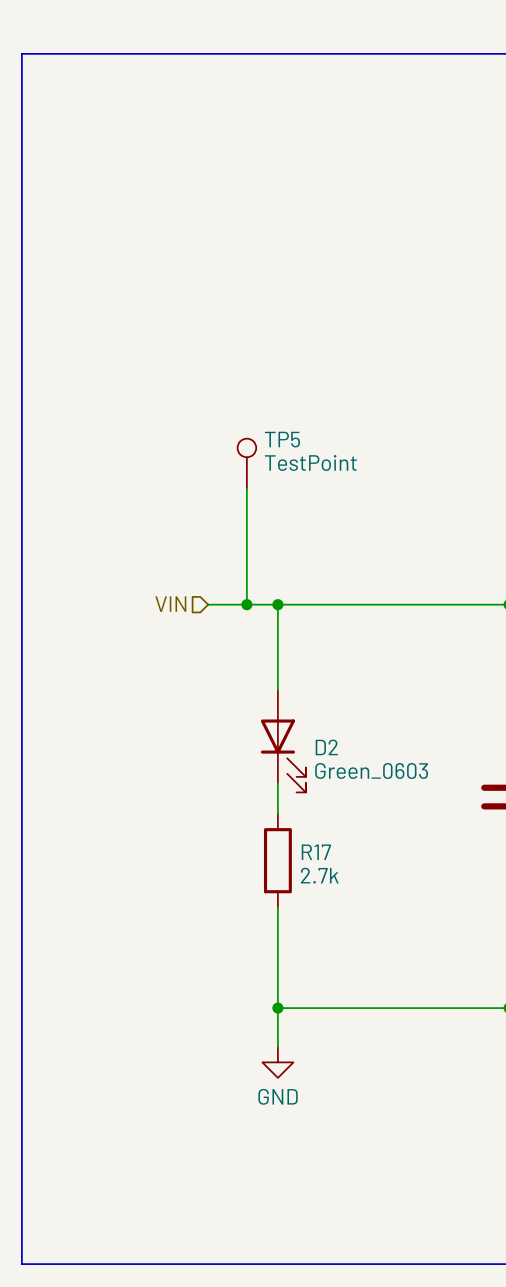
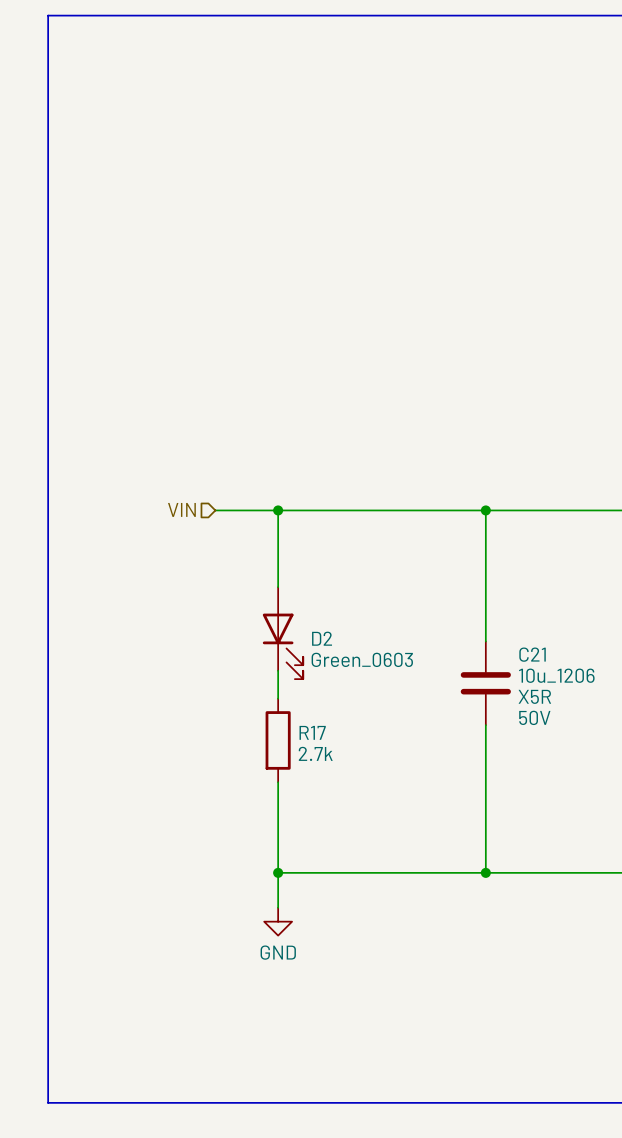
TP5: TestPoint (246, 463) -> none
wire: (246, 488) (246, 604) -> none
junction: (246, 604) -> none

